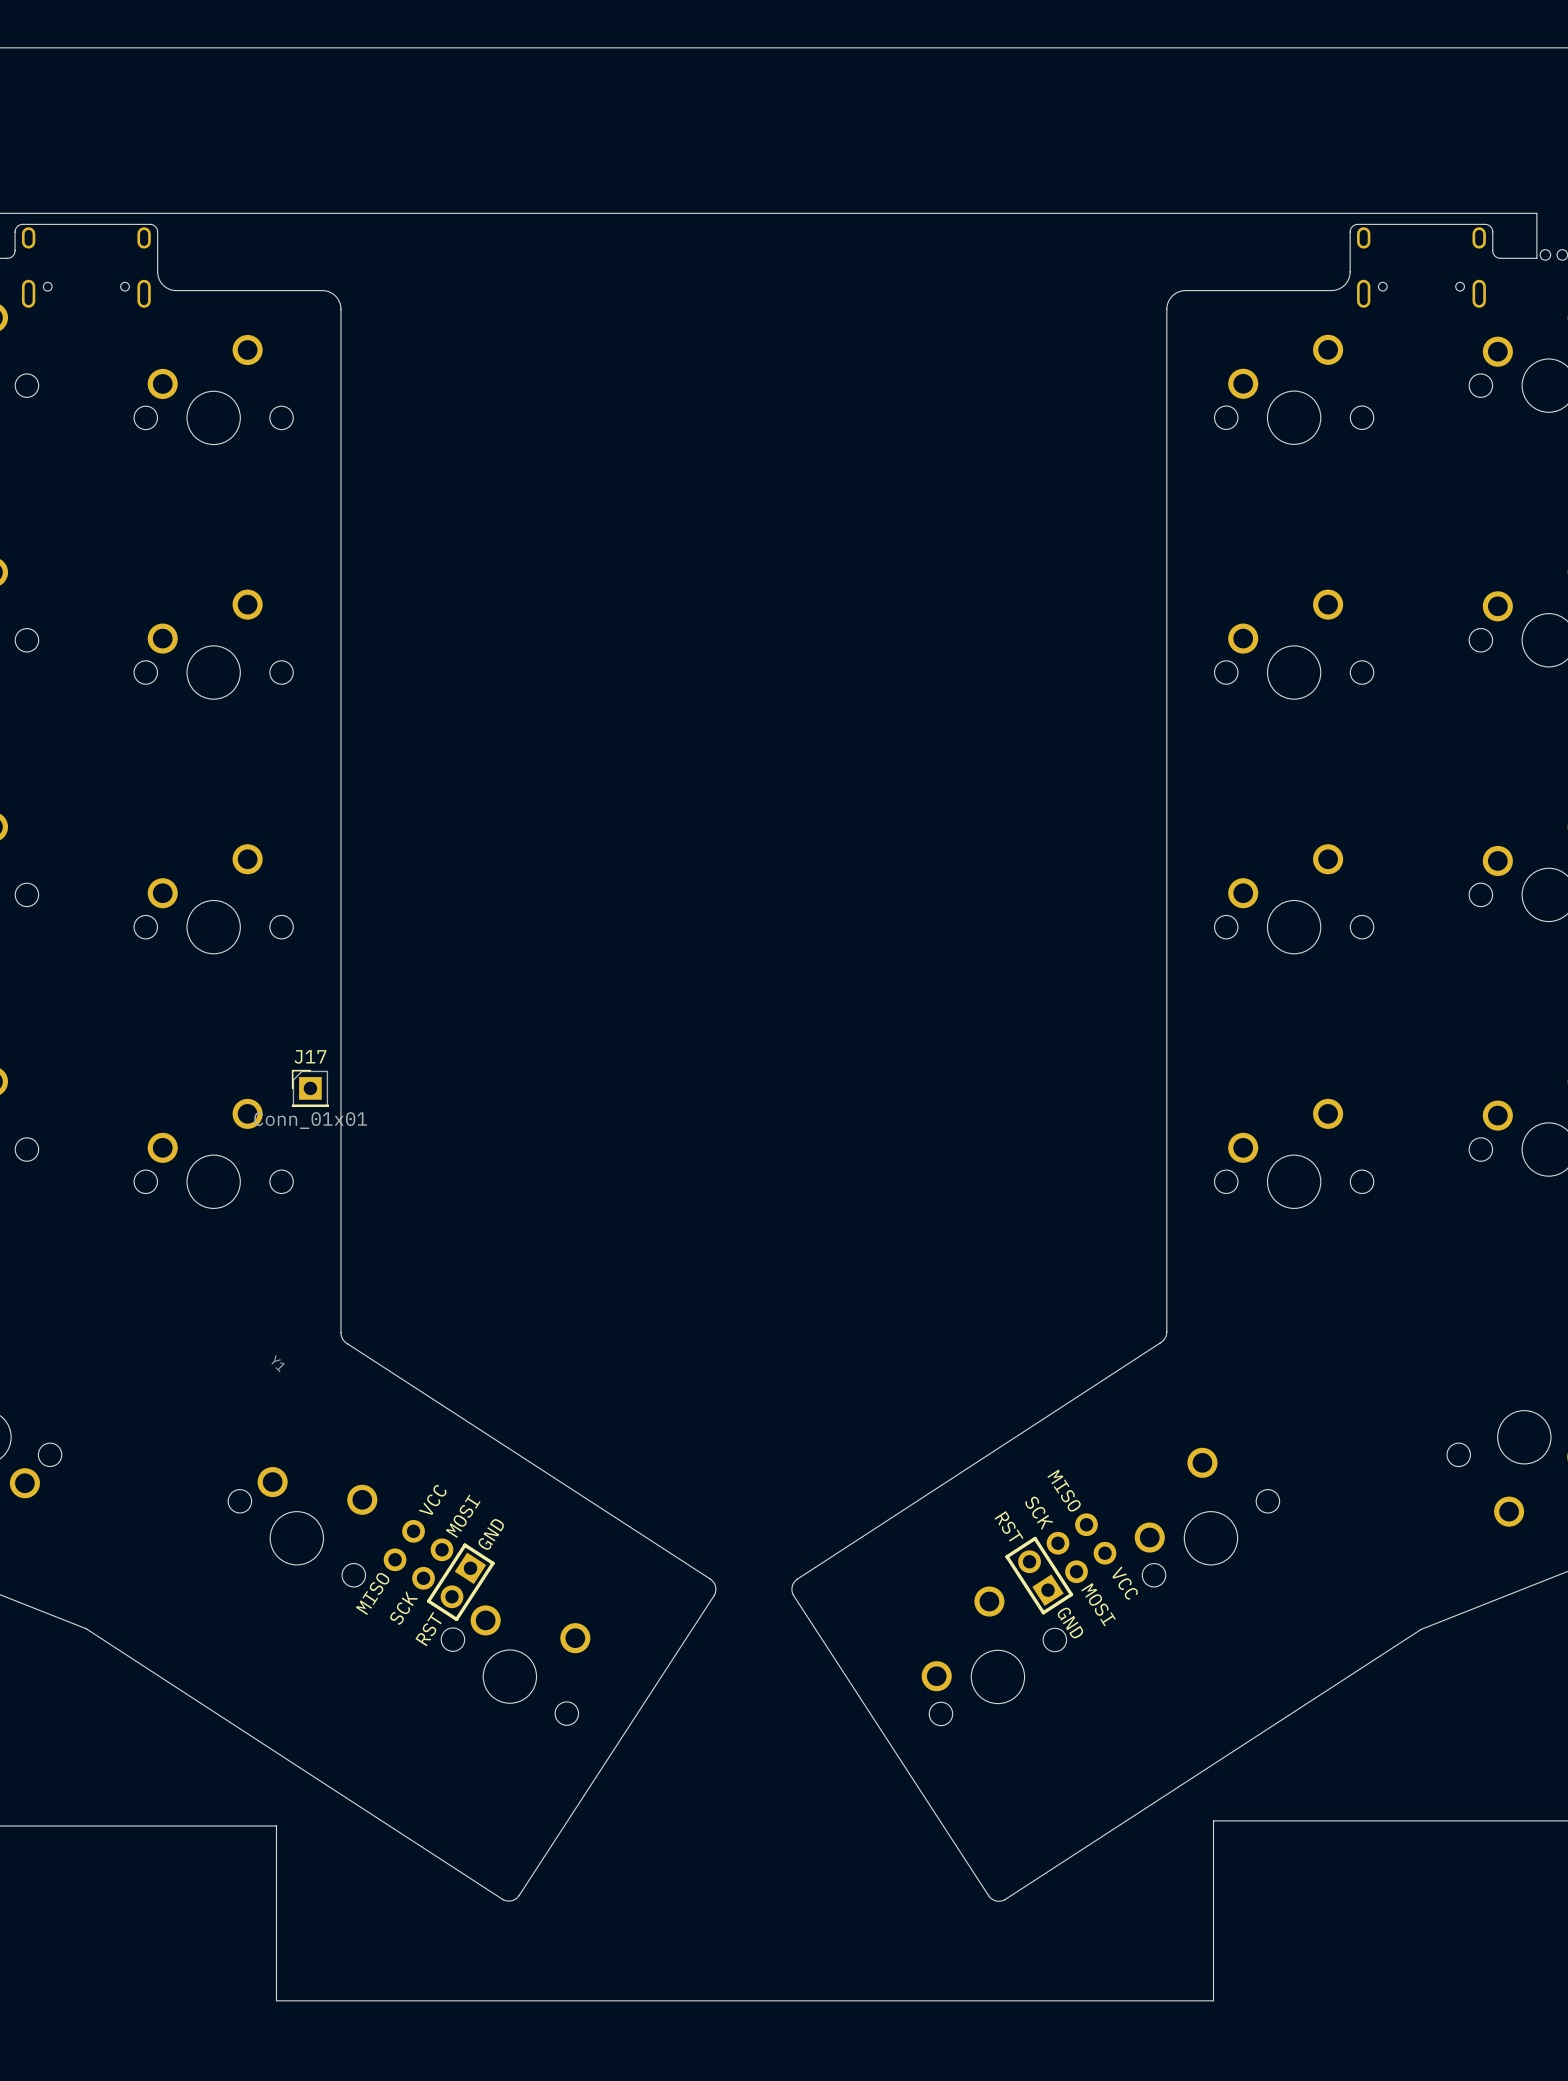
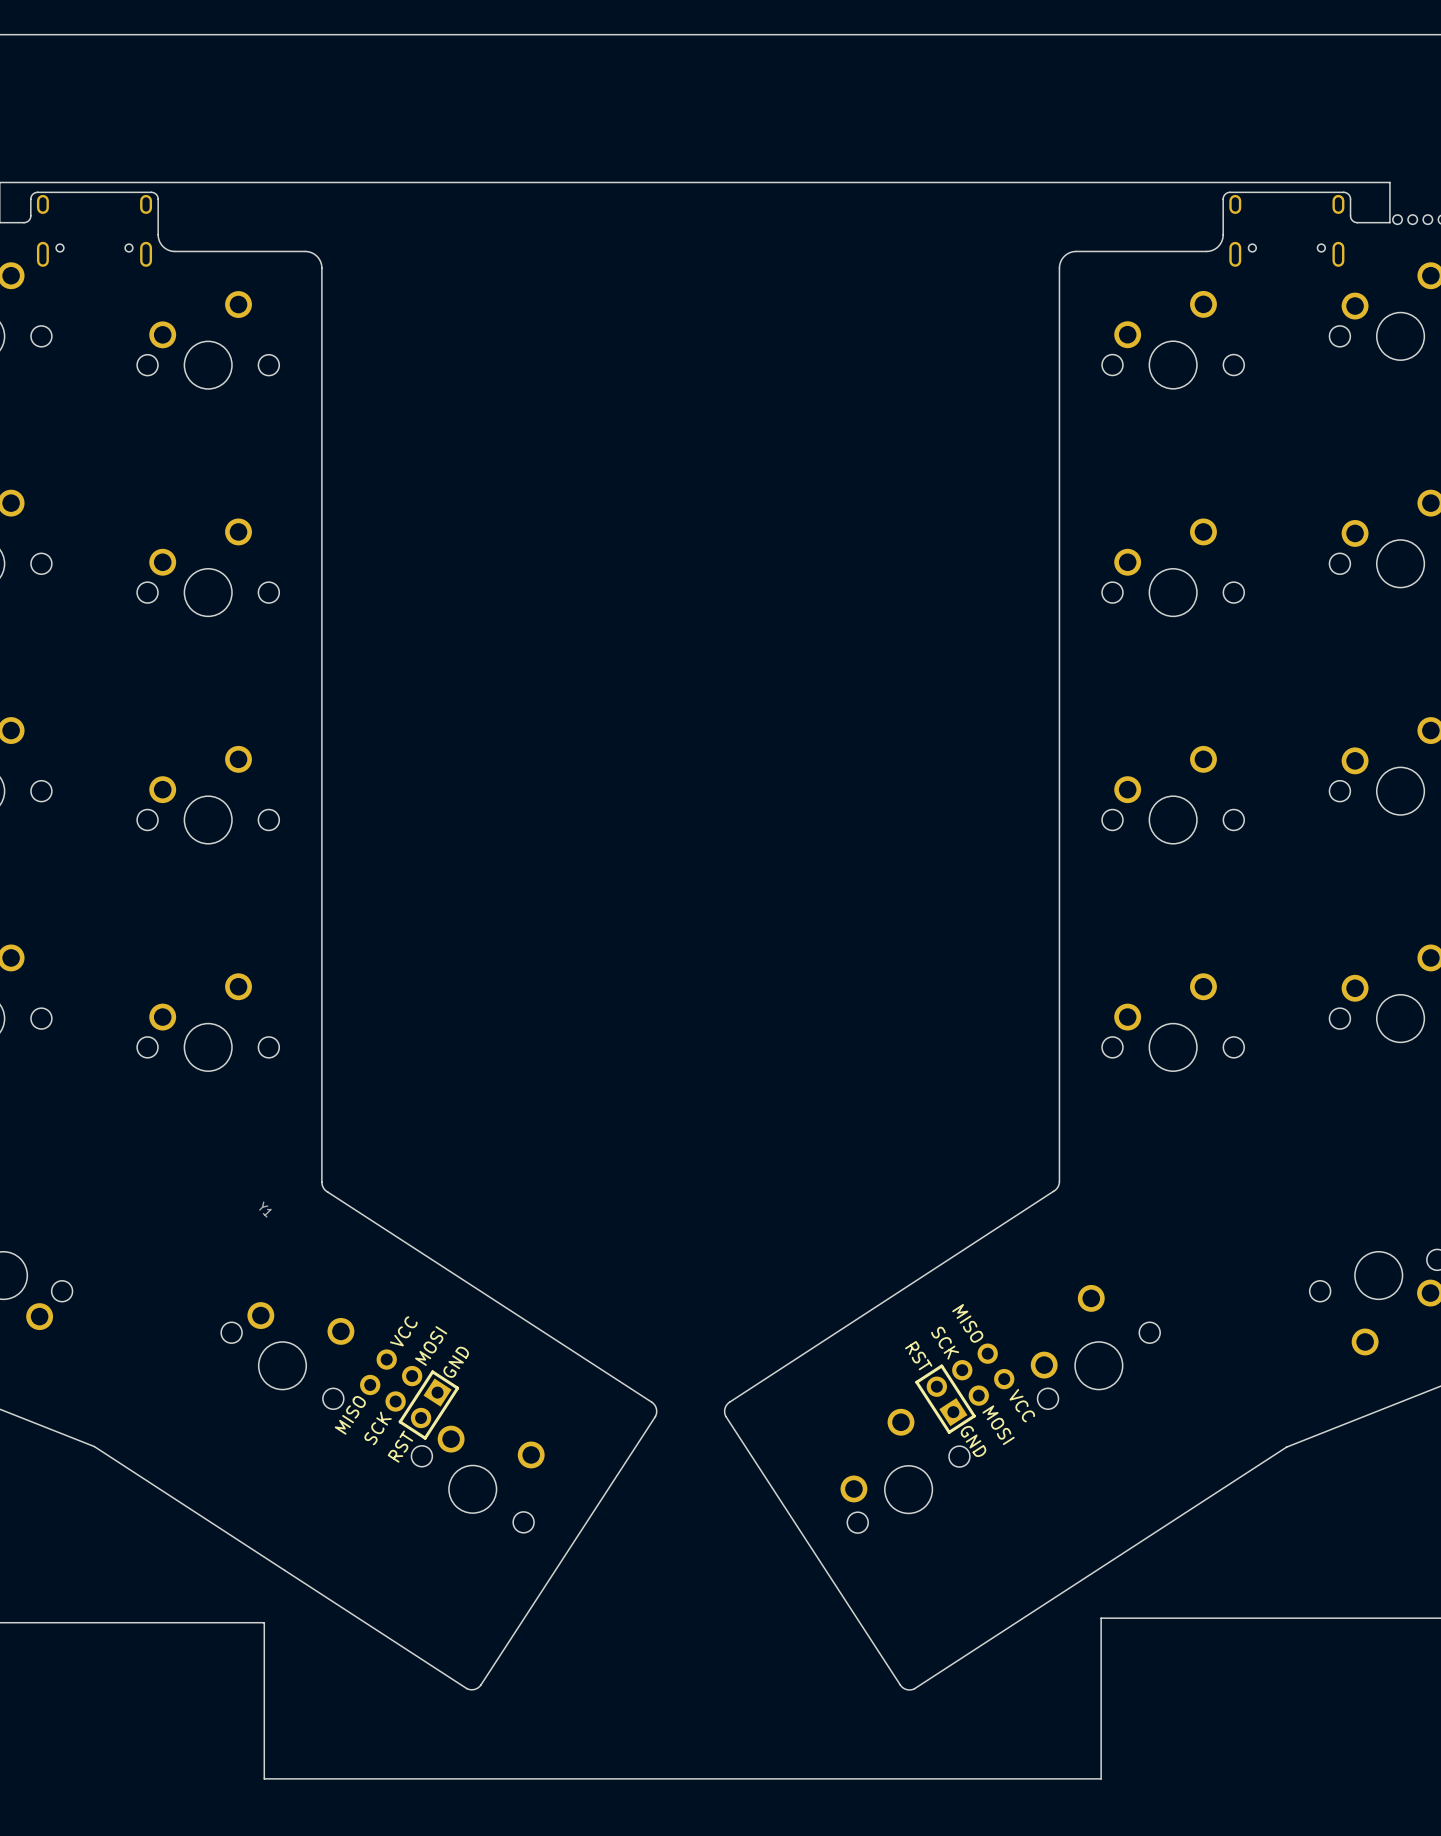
J17: Conn_01x01 (310, 1088) -> none

